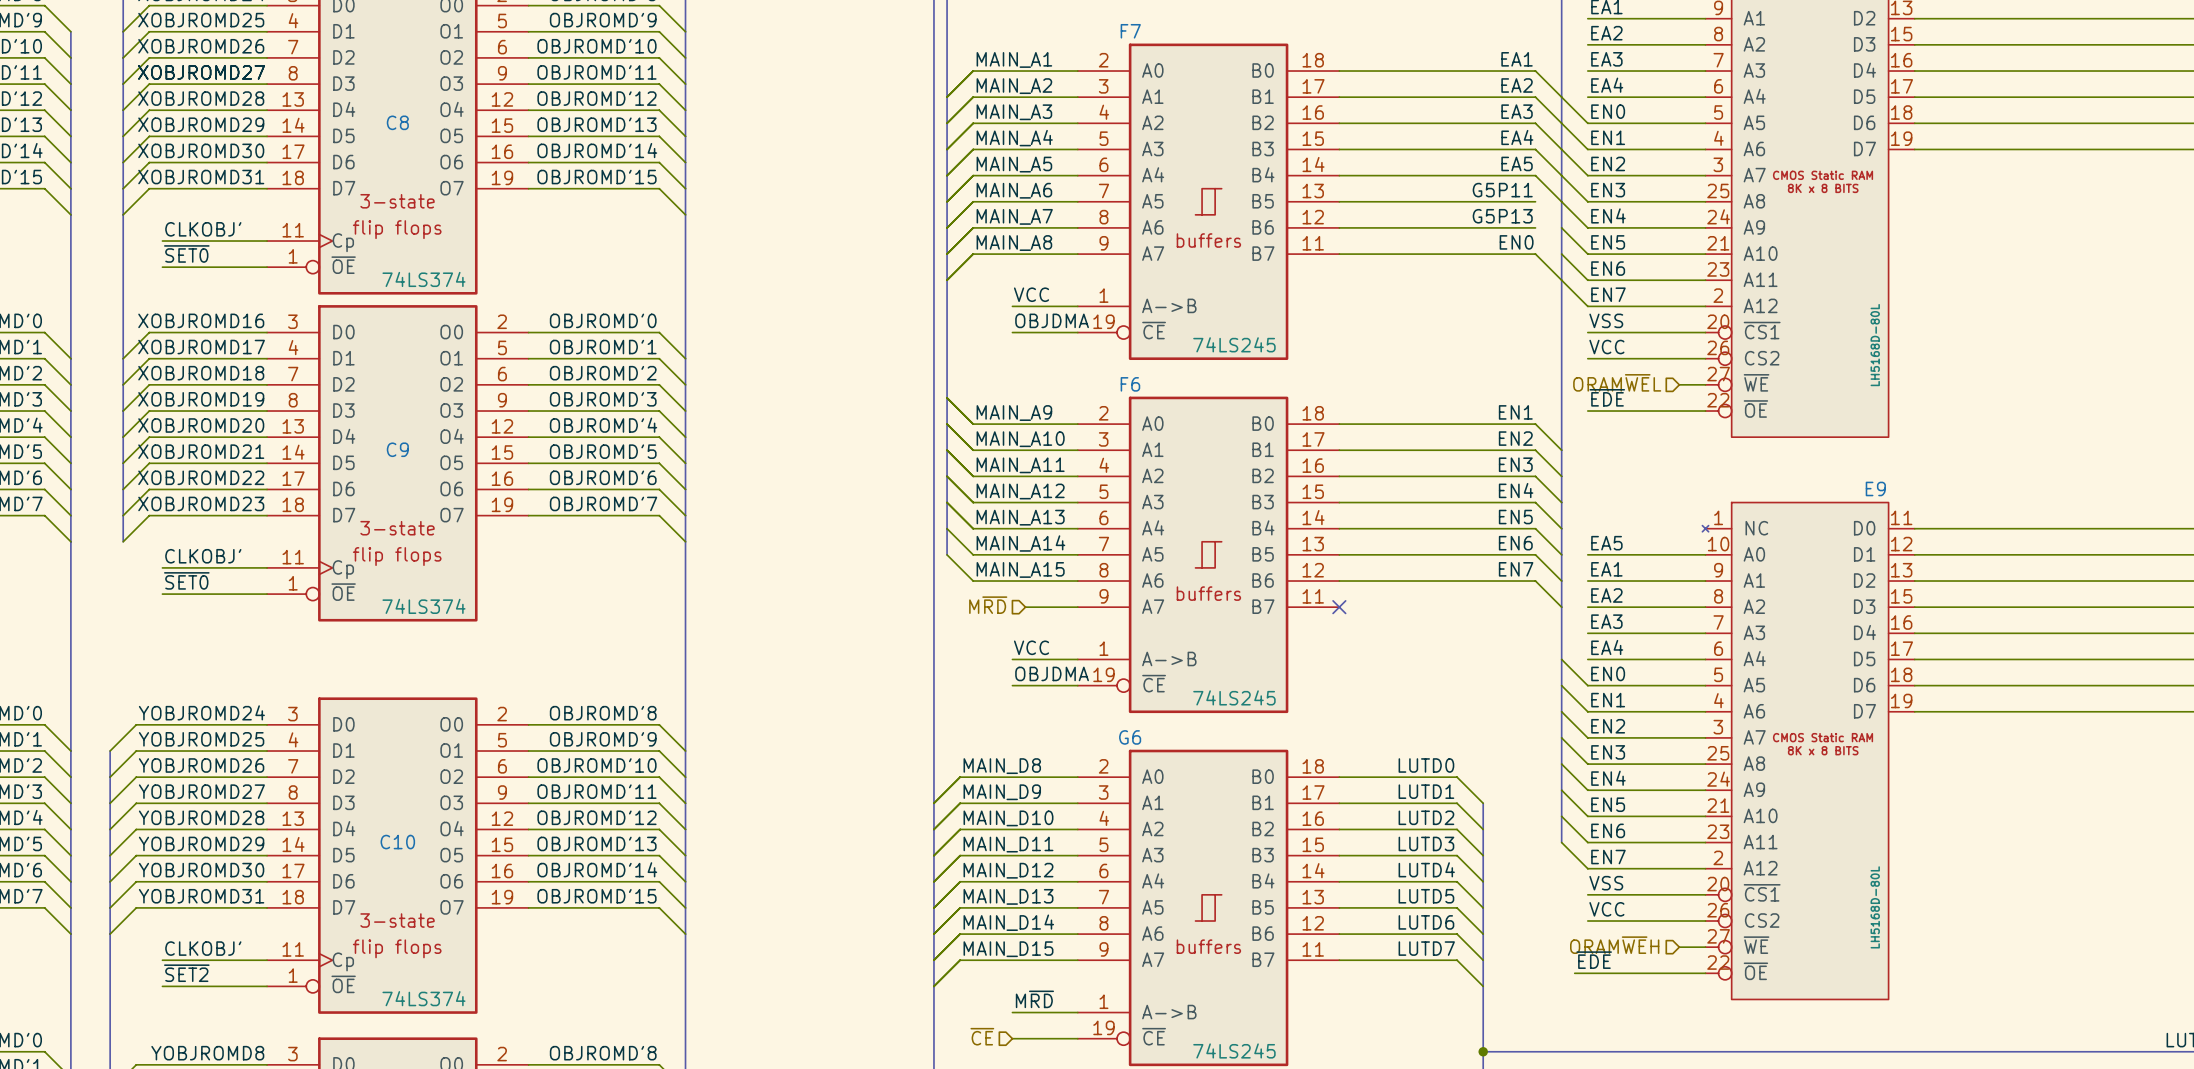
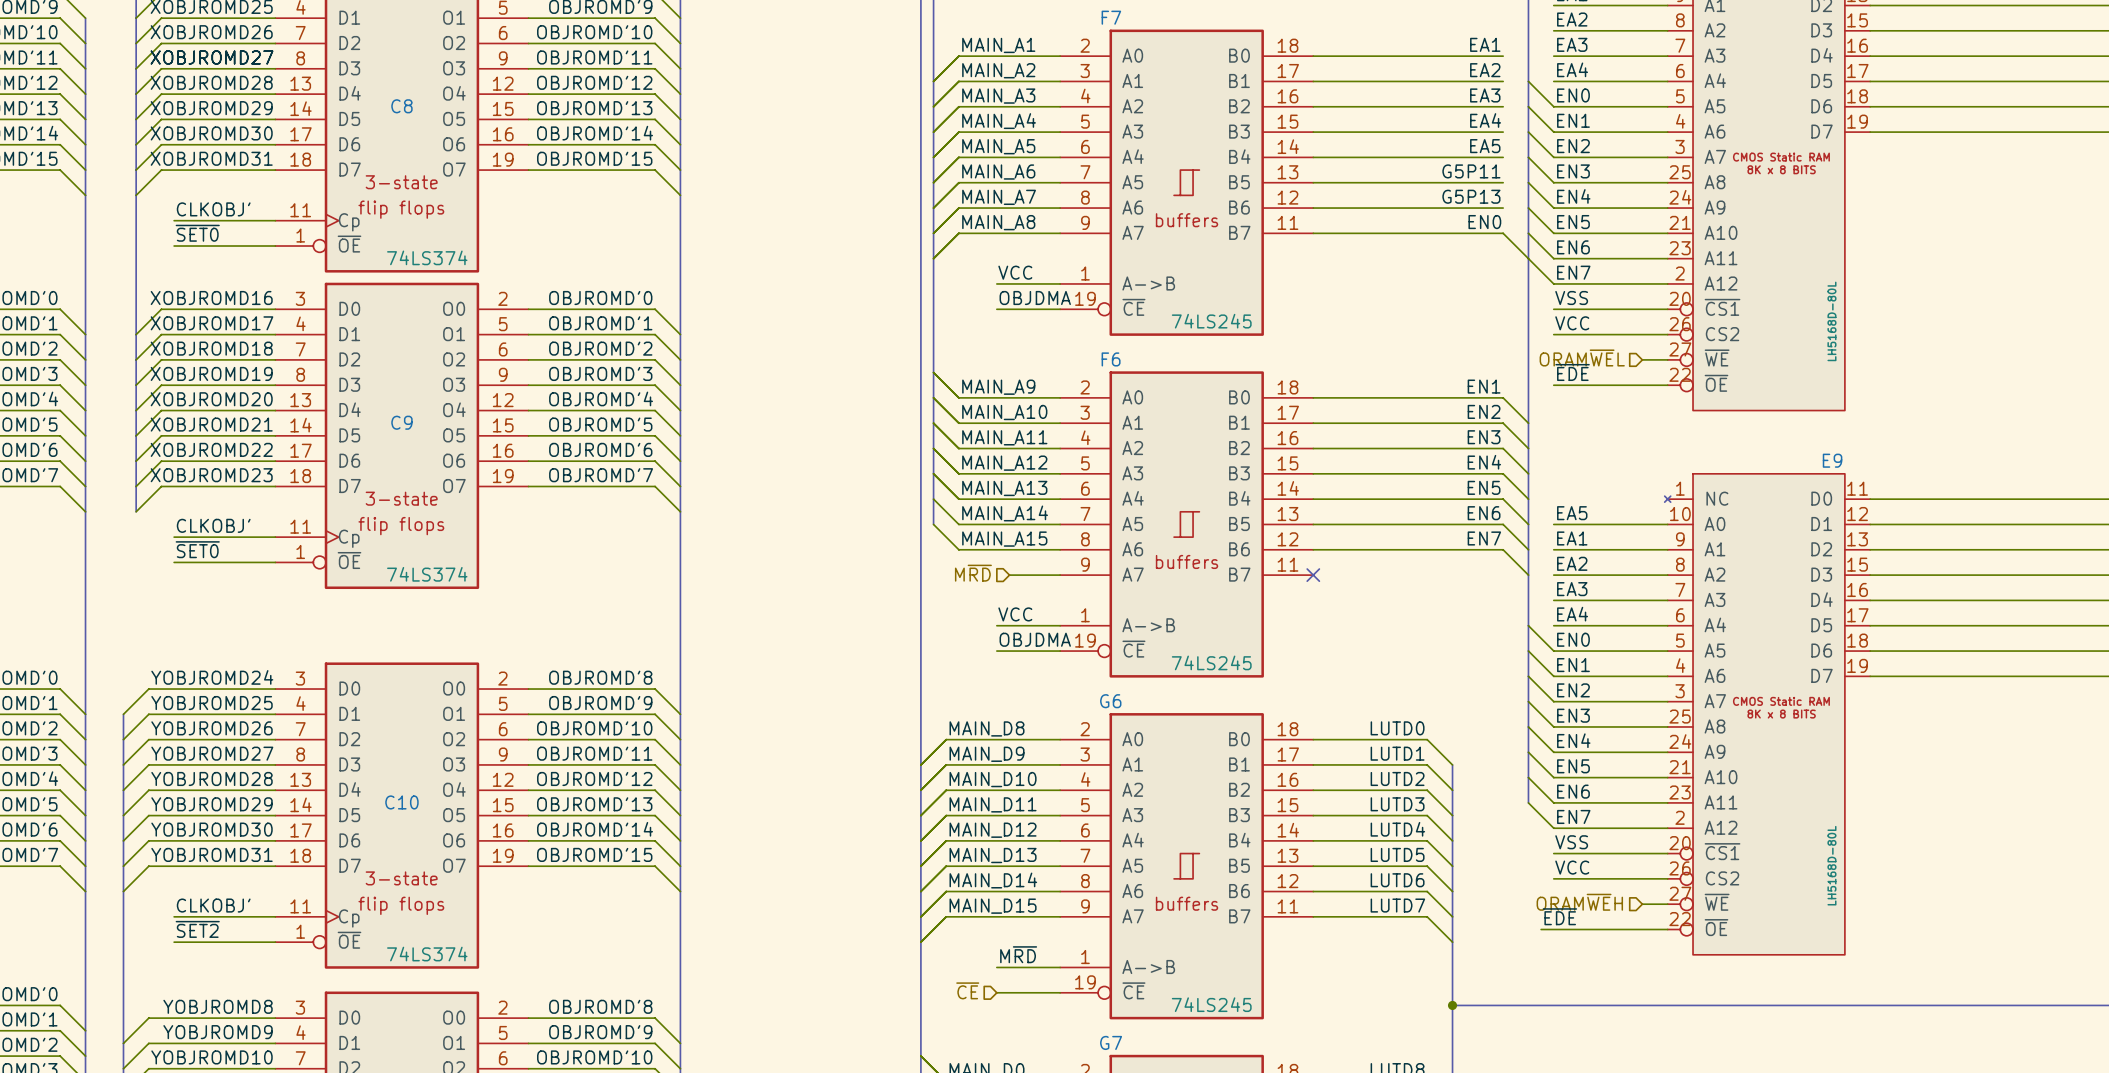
wire: (1535, 71) (1561, 97) -> none
wire: (1535, 97) (1561, 123) -> none
wire: (1535, 123) (1561, 149) -> none
wire: (1535, 149) (1561, 175) -> none
wire: (1535, 175) (1561, 201) -> none

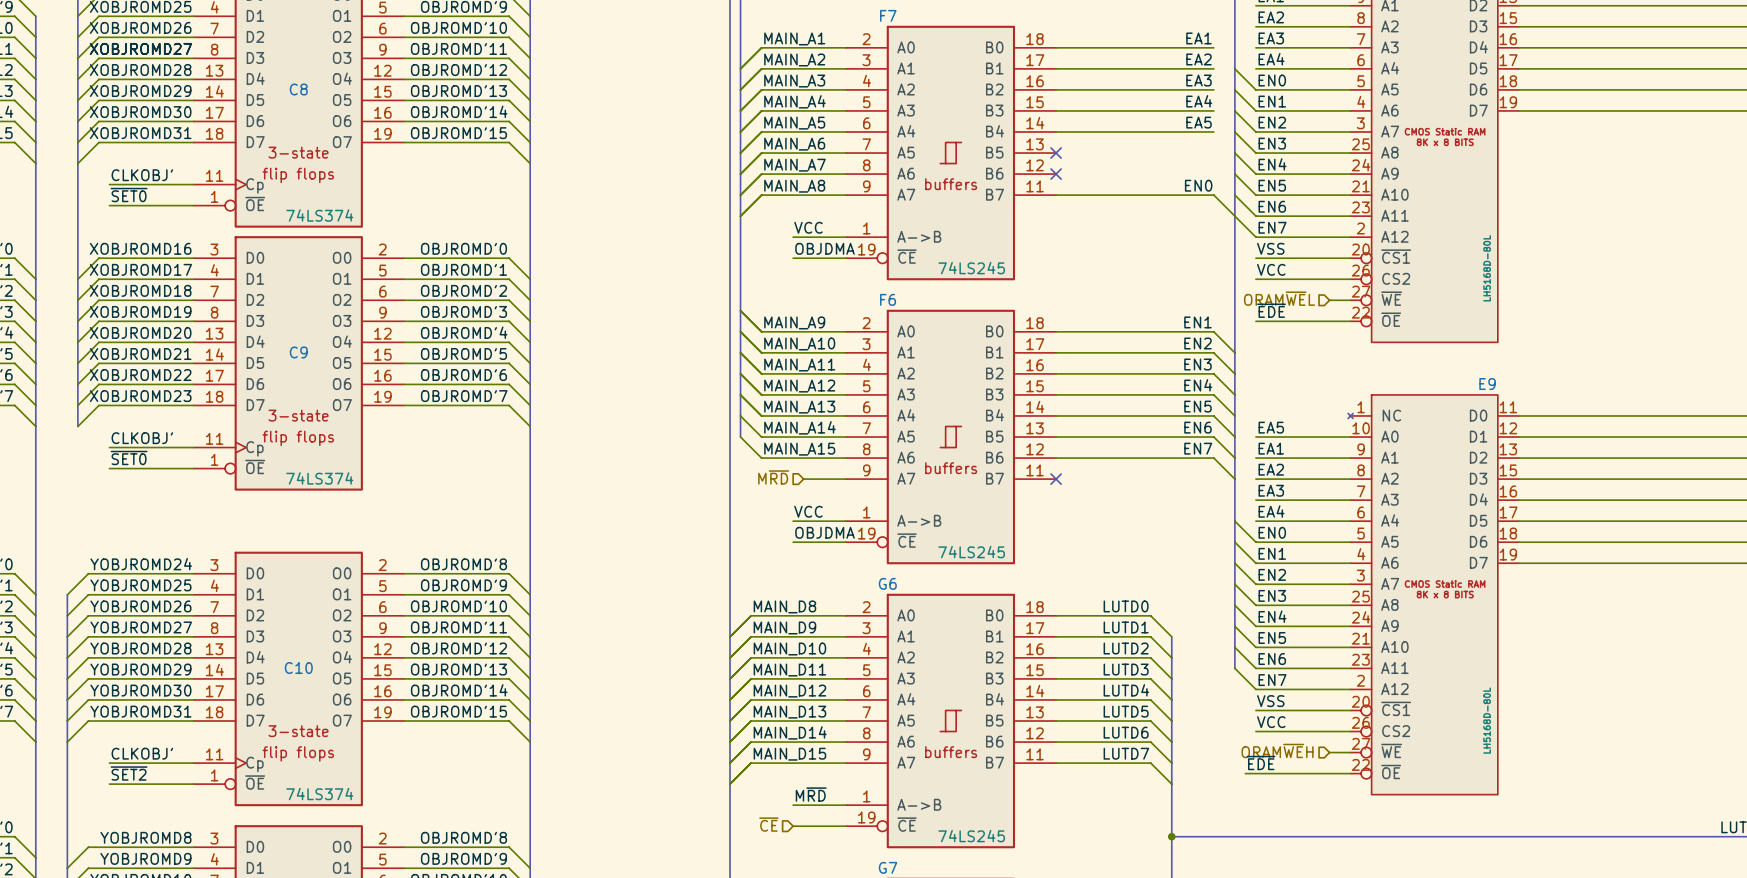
label: G5P11 (1471, 171) -> none
wire: (1313, 182) (1503, 182) -> none
no-connect mark: none -> (1056, 153)
label: G5P13 (1471, 196) -> none
wire: (1313, 208) (1503, 208) -> none
no-connect mark: none -> (1056, 174)

